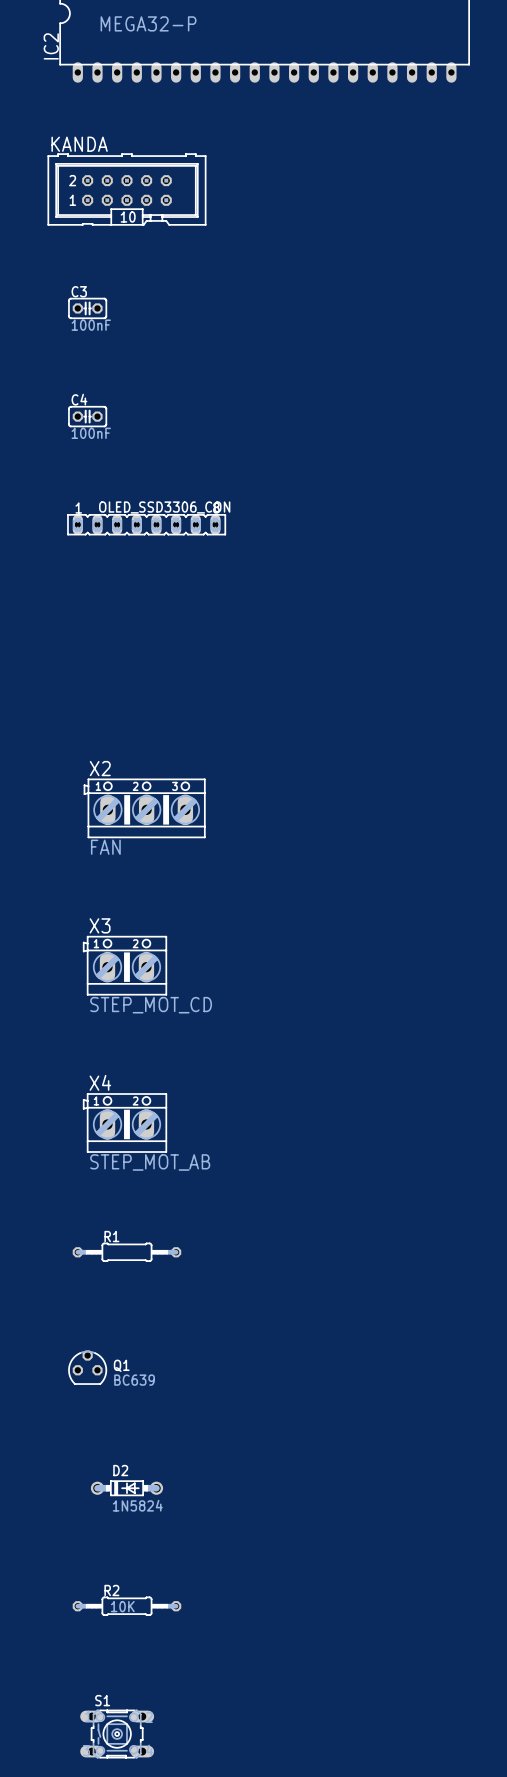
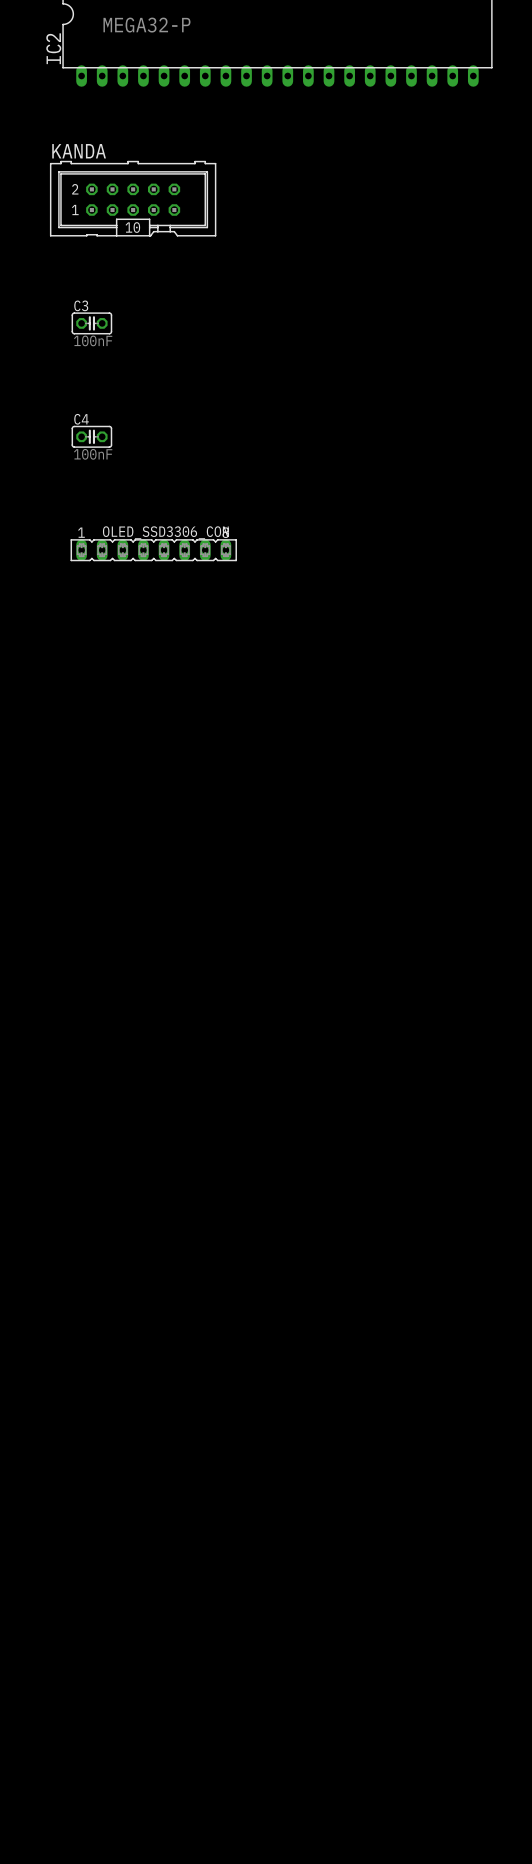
X2: FAN (144, 808) -> none
X3: STEP_MOT_CD (125, 965) -> none
X4: STEP_MOT_AB (125, 1122) -> none
R1: (126, 1252) -> none
Q1: BC639 (87, 1367) -> none
D2: 1N5824 (126, 1488) -> none
R2: 10K (126, 1606) -> none
S1: (117, 1734) -> none

